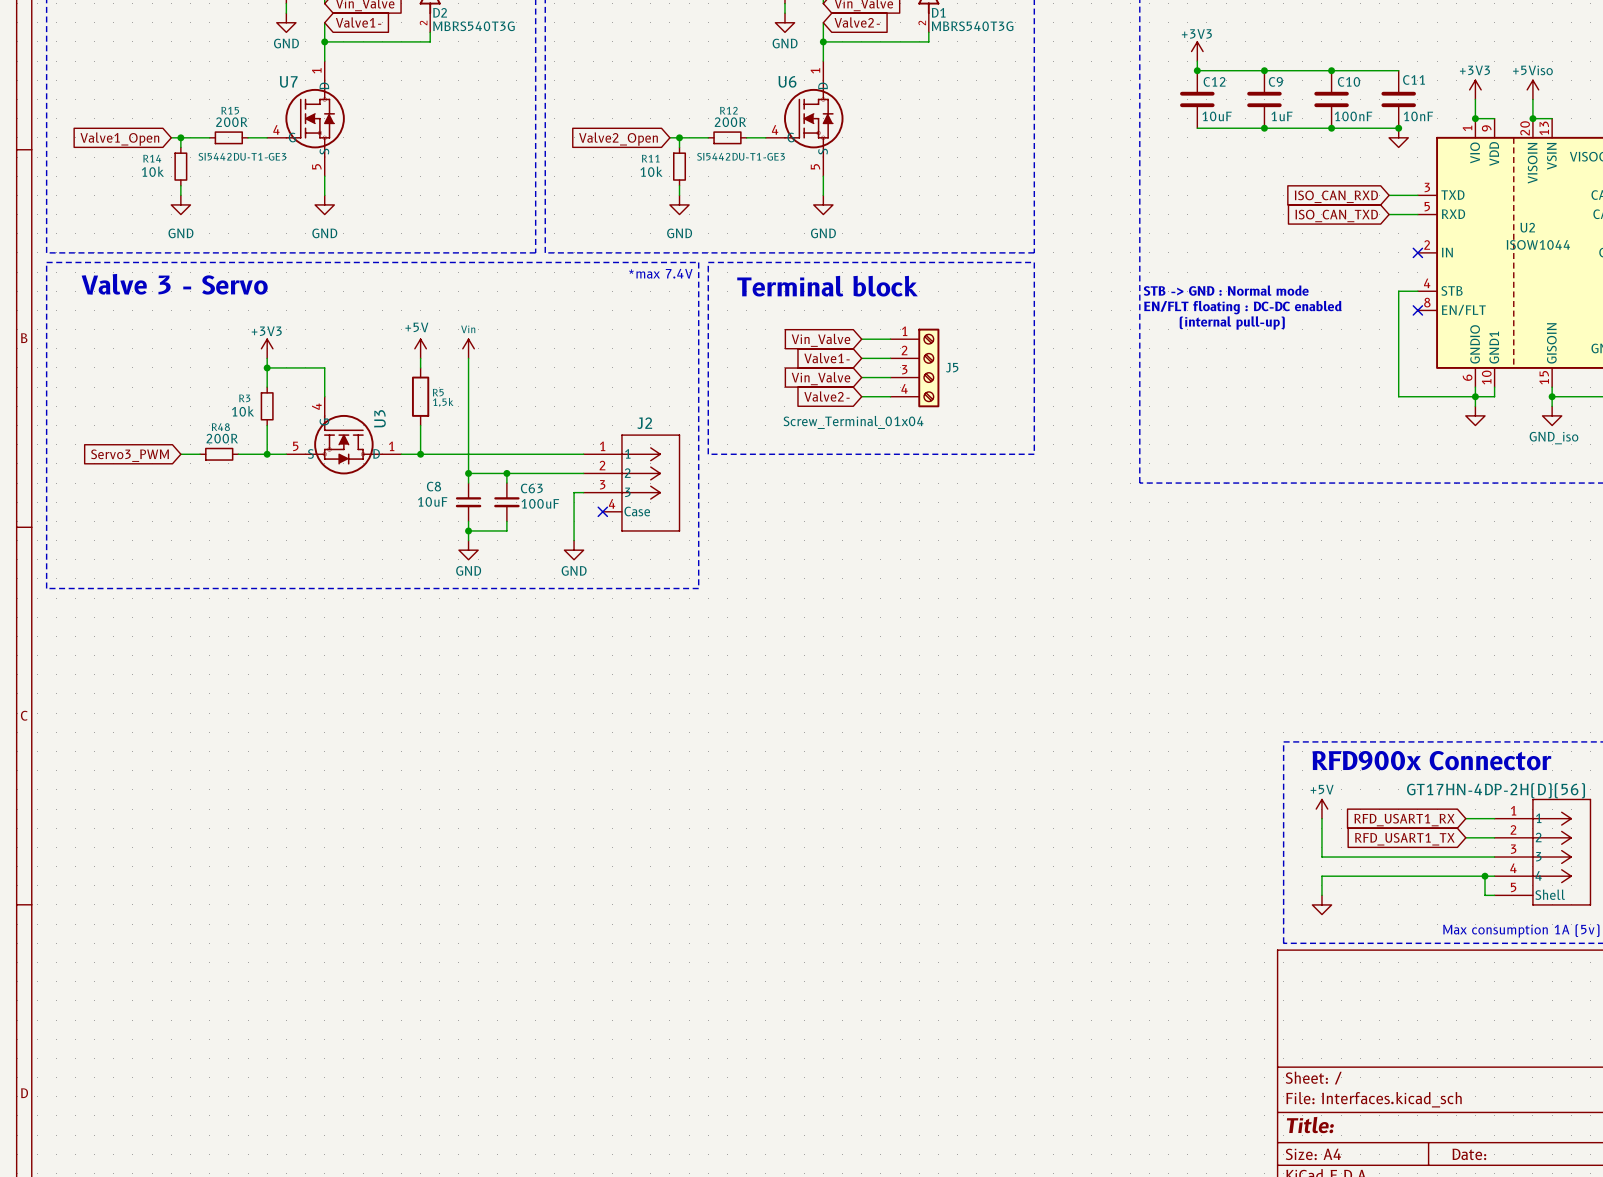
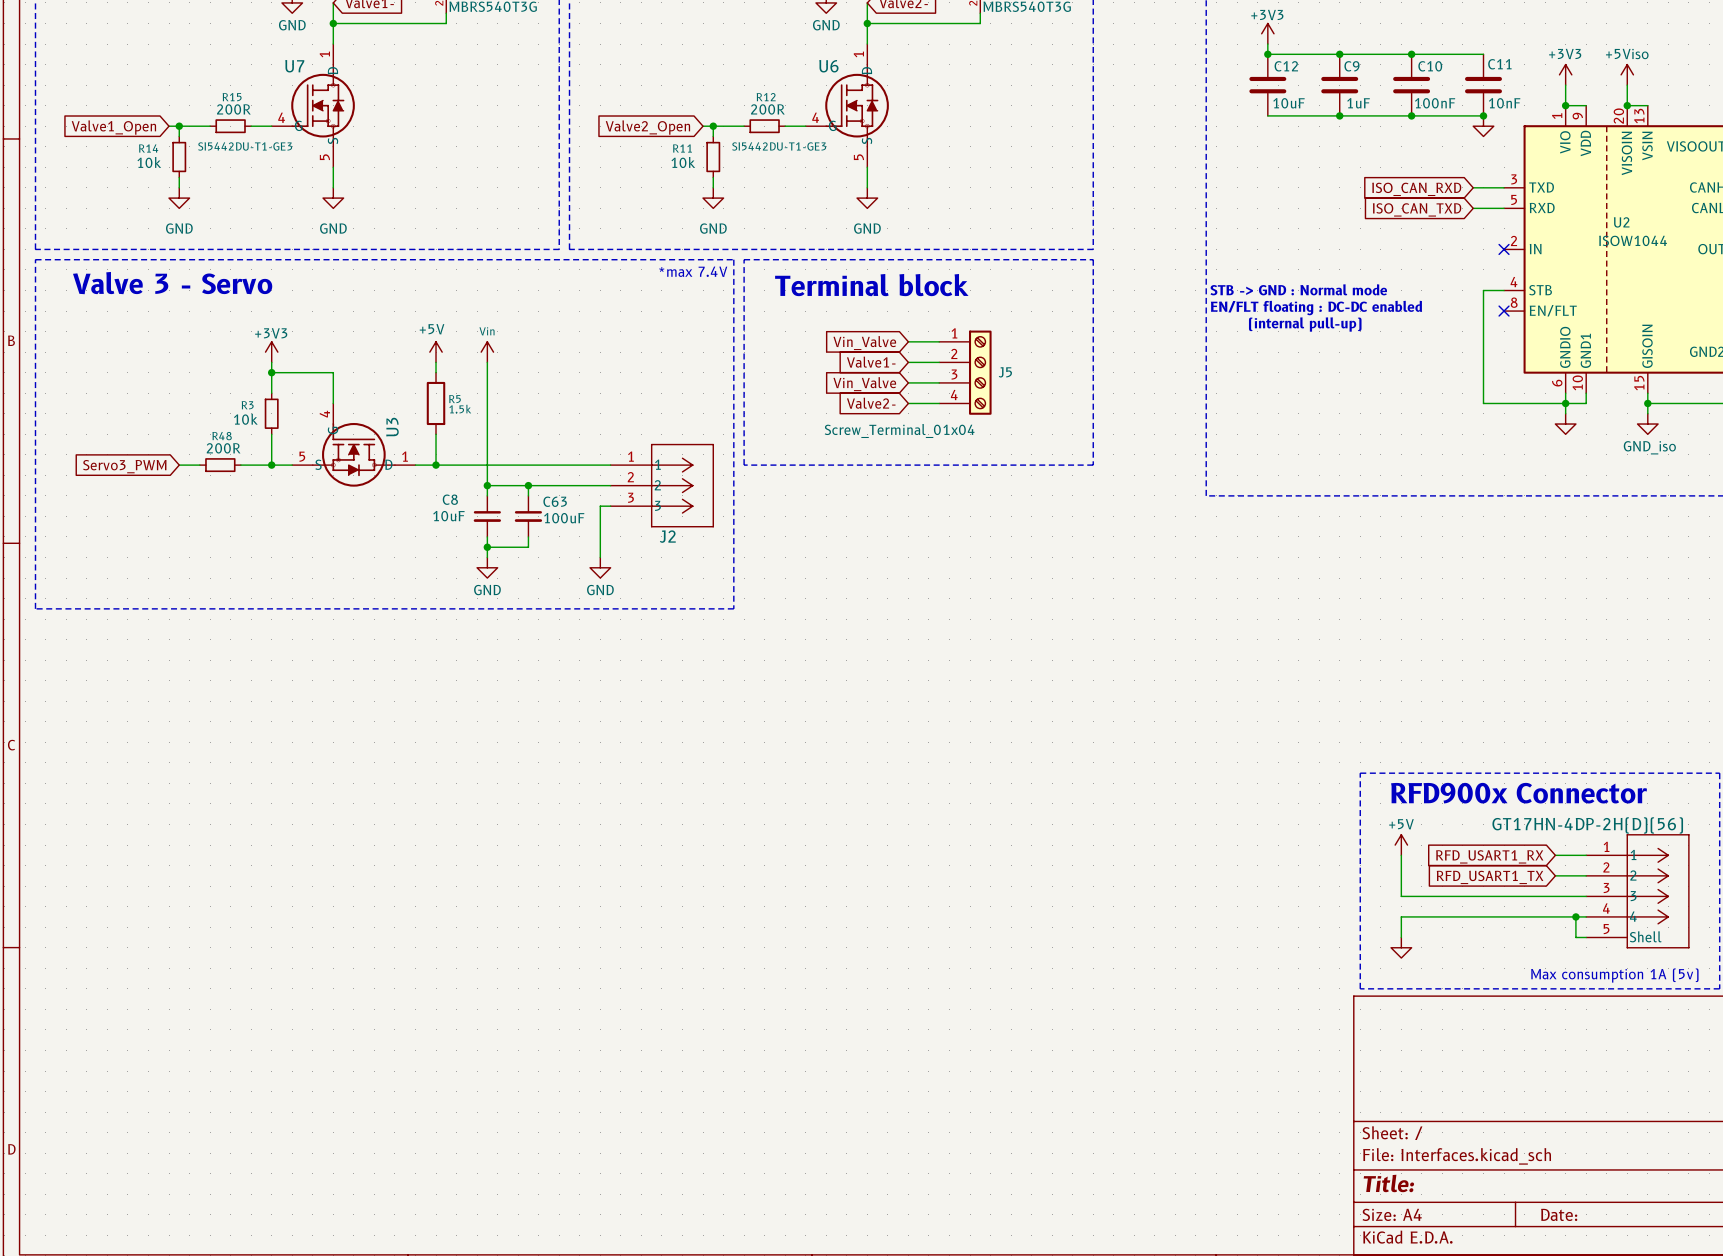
J2 name position: J2 (644, 423) -> J2 (667, 536)
J2 symbol: [583, 434, 680, 532] -> [610, 444, 714, 528]
no-connect mark: (602, 511) -> none

